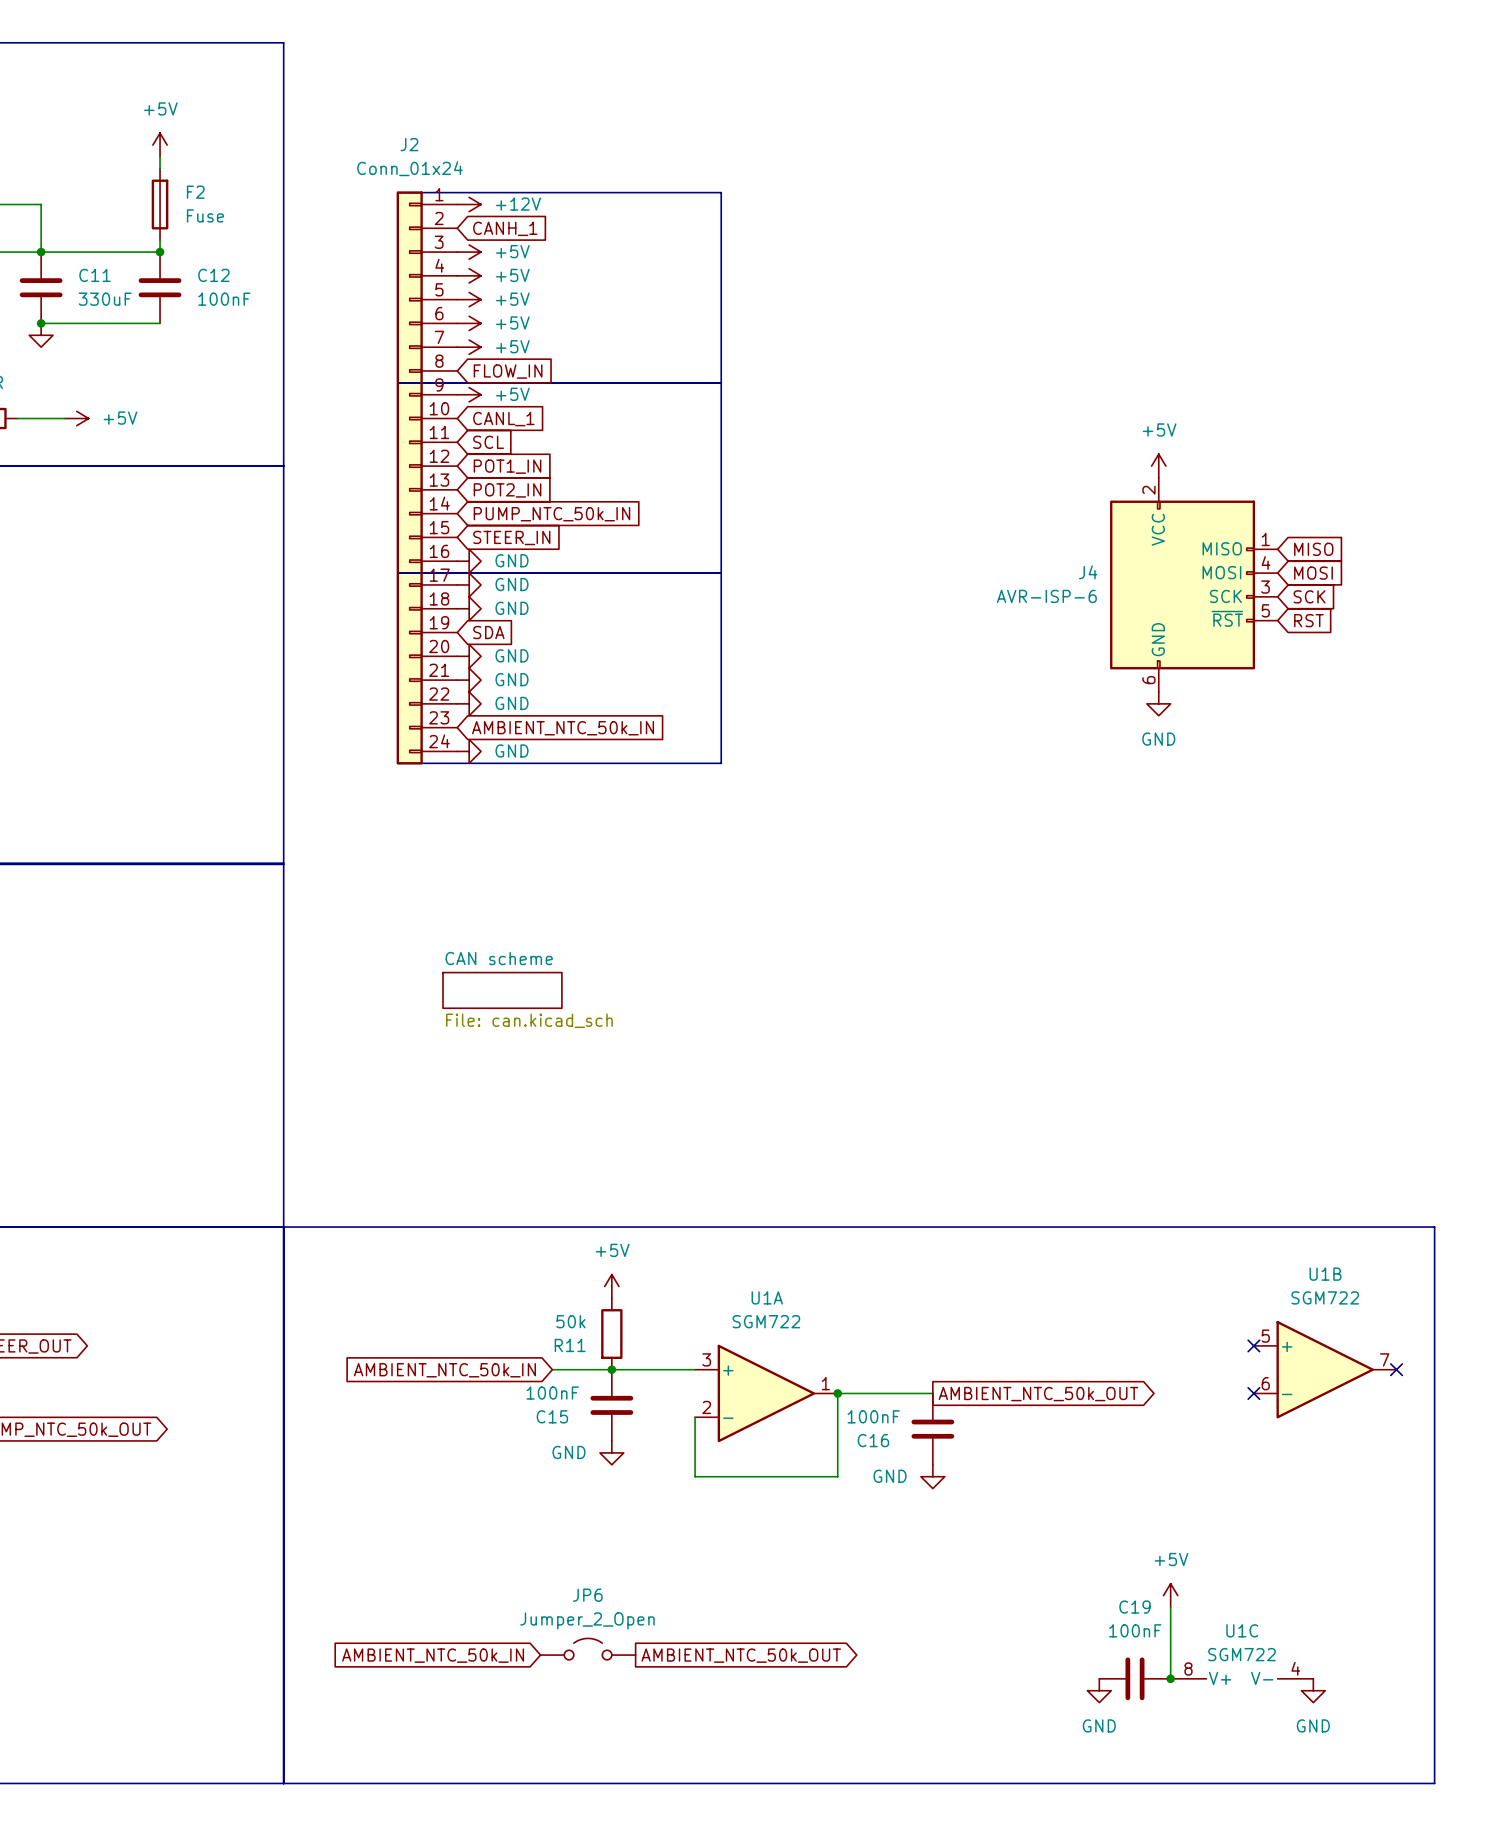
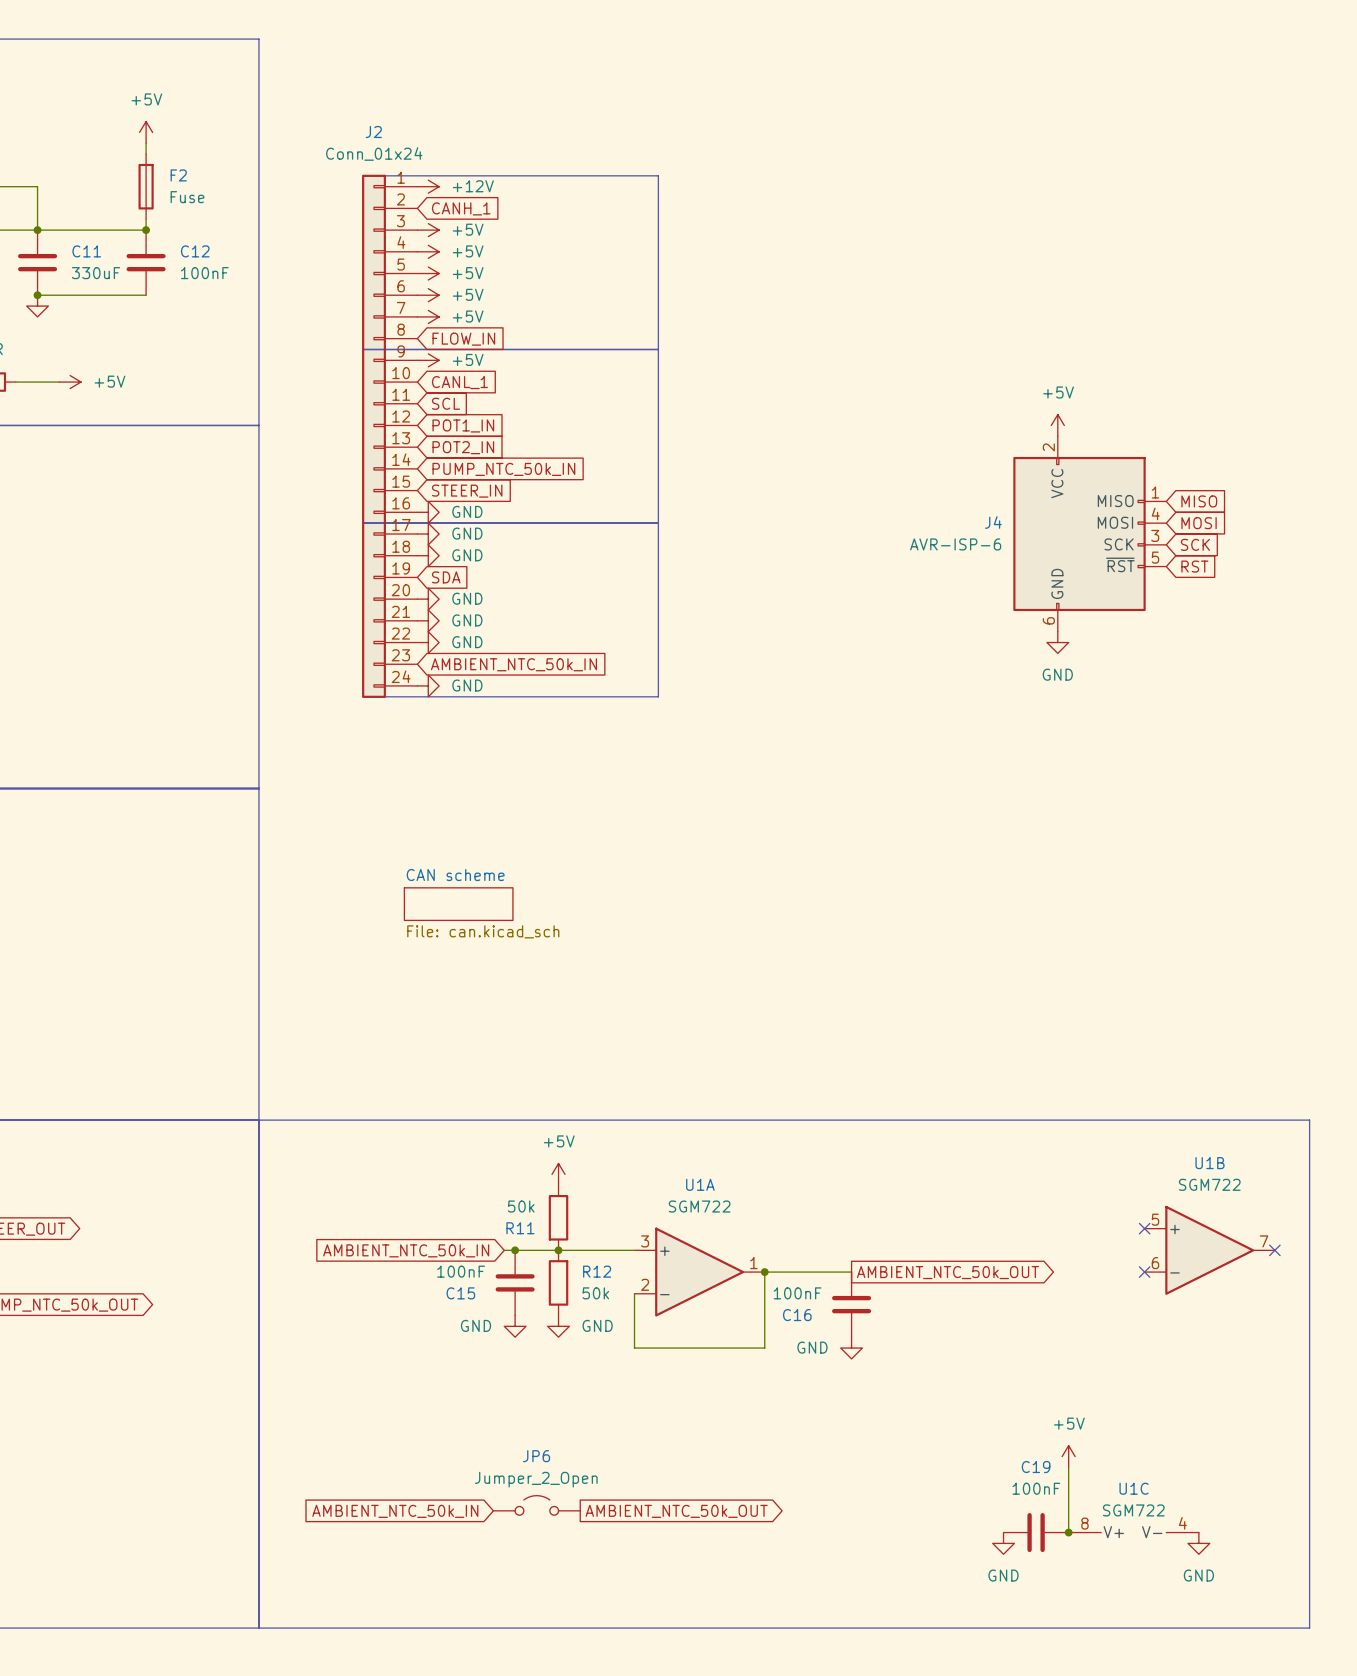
junction: none -> (515, 1250)
C15 position: (611, 1405) -> (515, 1282)
R12: none -> 50k (558, 1282)
power symbol: none -> GND (515, 1326)
power symbol text position: GND (569, 1452) -> GND (597, 1325)

